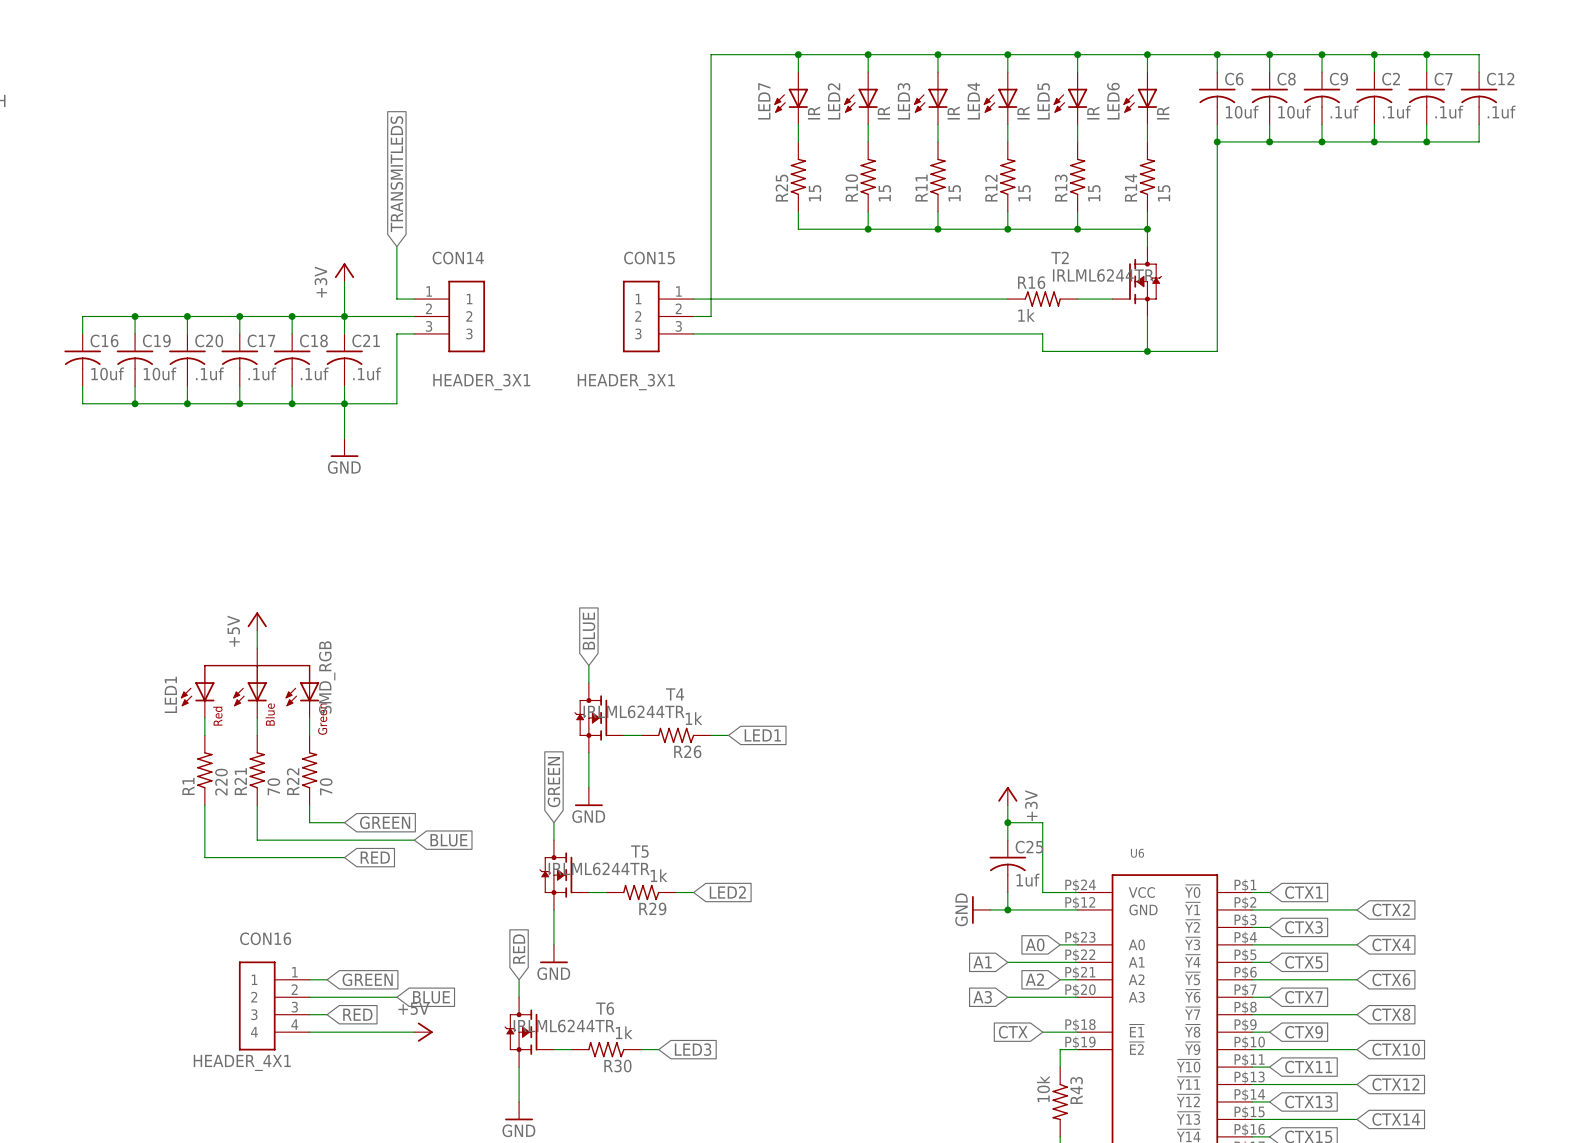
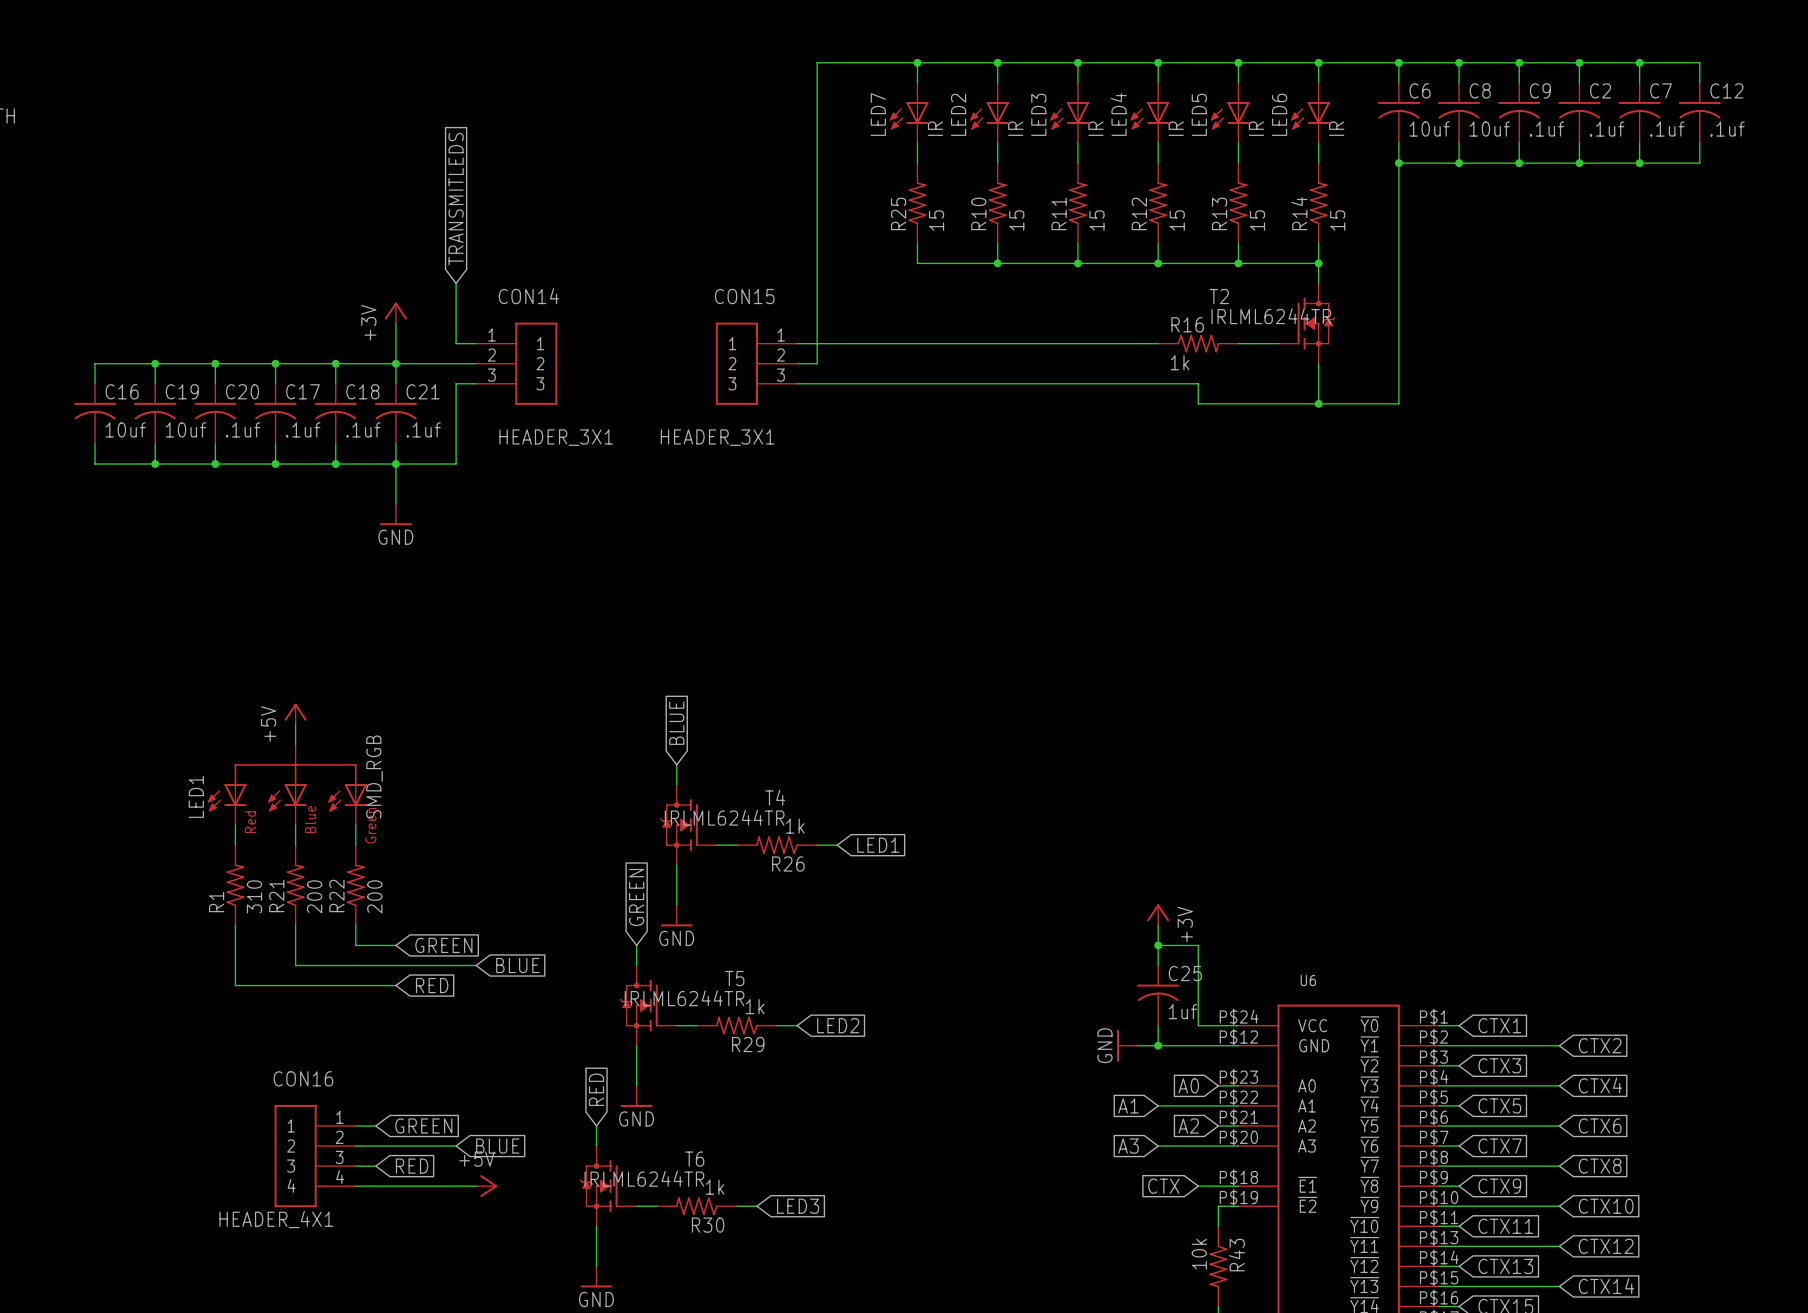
R1 value: 220 (221, 782) -> 310 (254, 896)
R21 value: 70 (273, 786) -> 200 (314, 896)
R22 value: 70 (326, 786) -> 200 (374, 896)

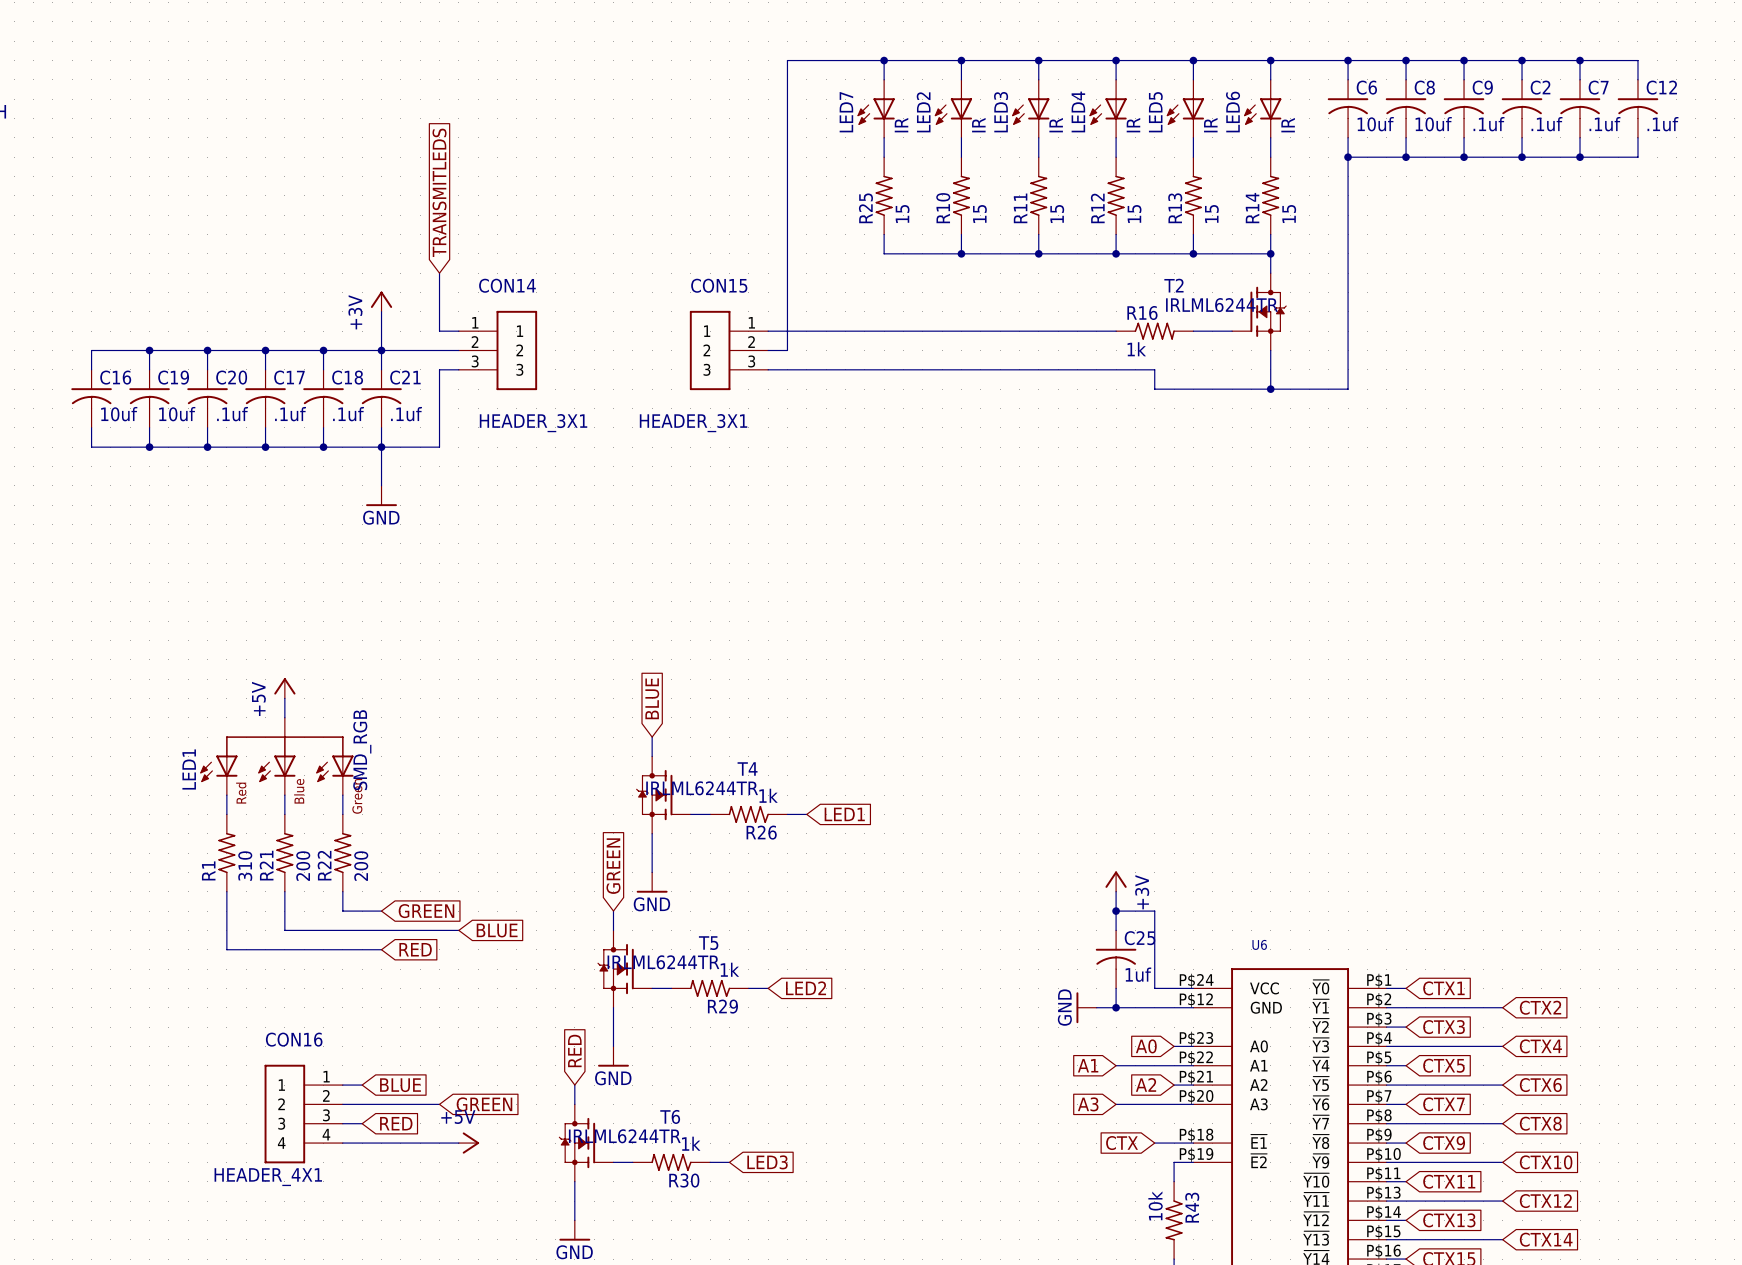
global label: GREEN (423, 1125) -> BLUE (400, 1085)
global label: BLUE (497, 1146) -> GREEN (484, 1104)

